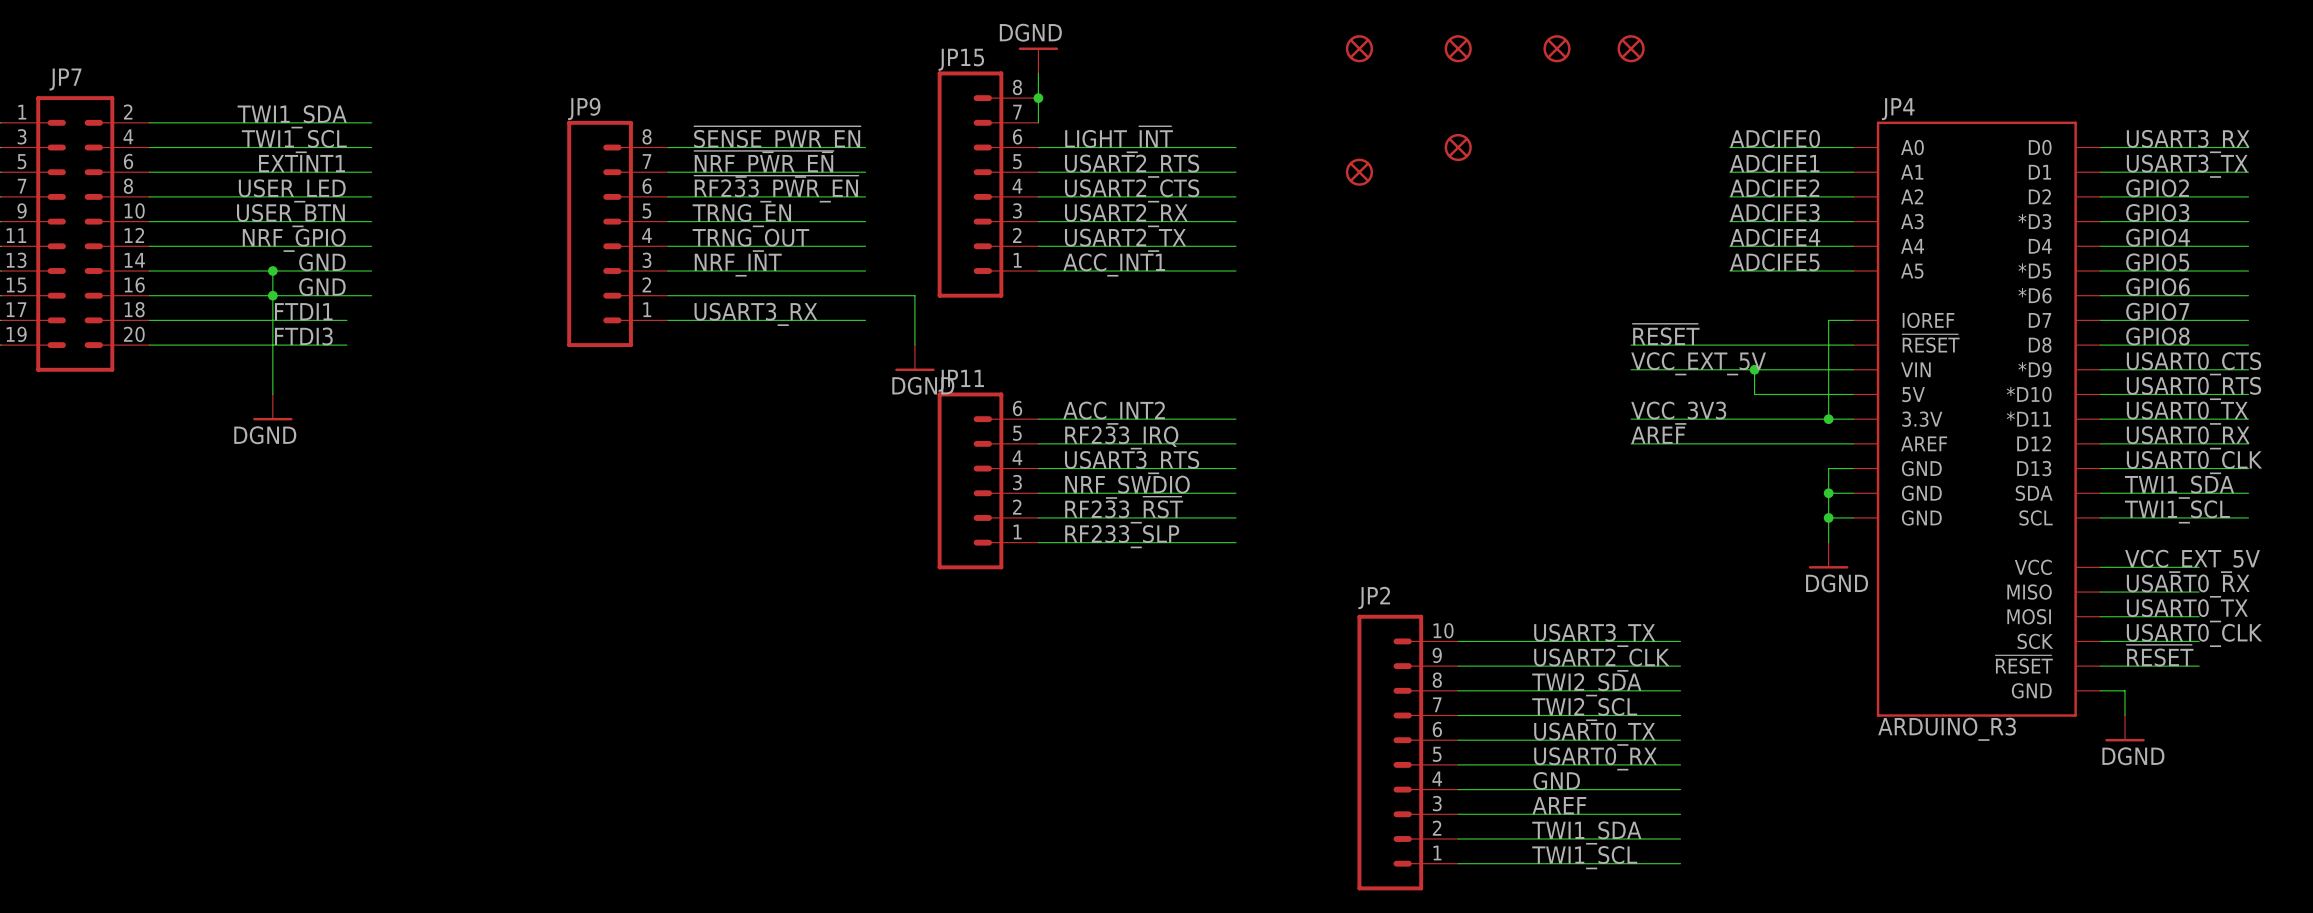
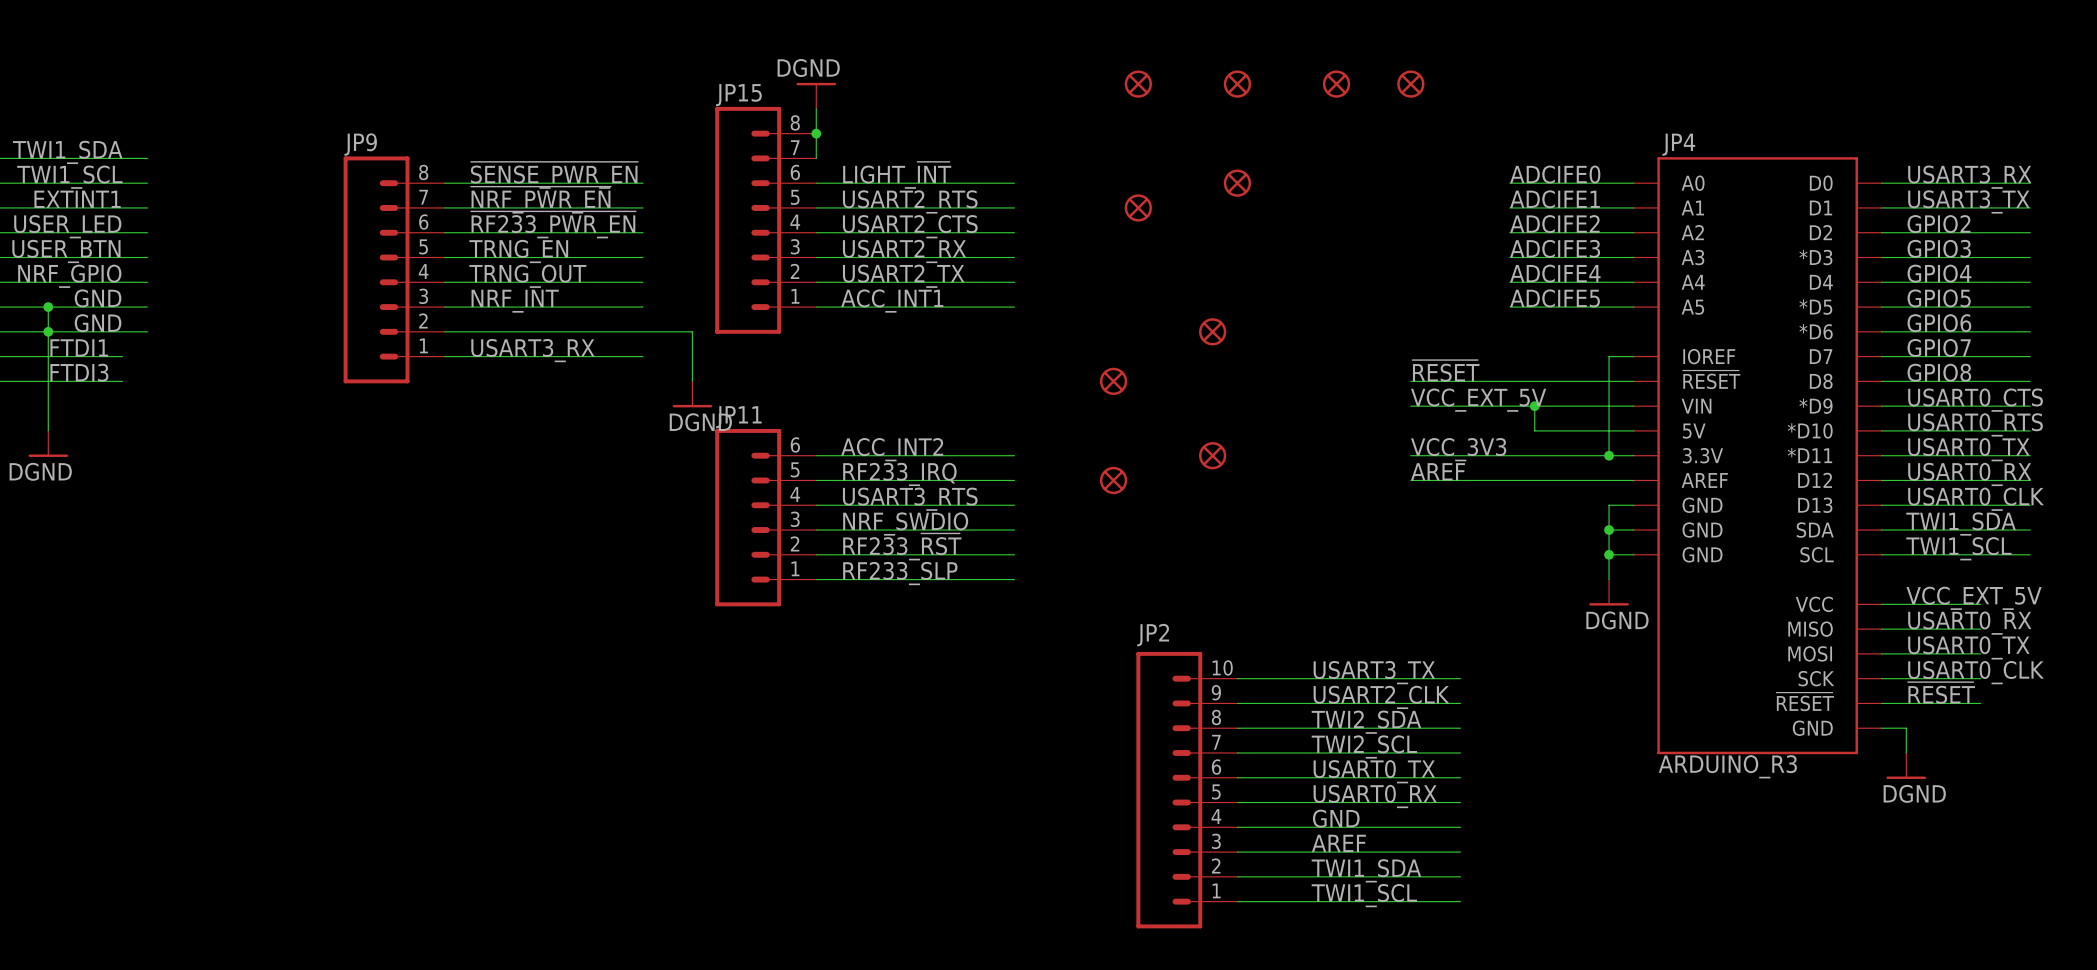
part: none -> (1212, 331)
part: none -> (1113, 381)
part: none -> (1212, 455)
part: none -> (1113, 480)

